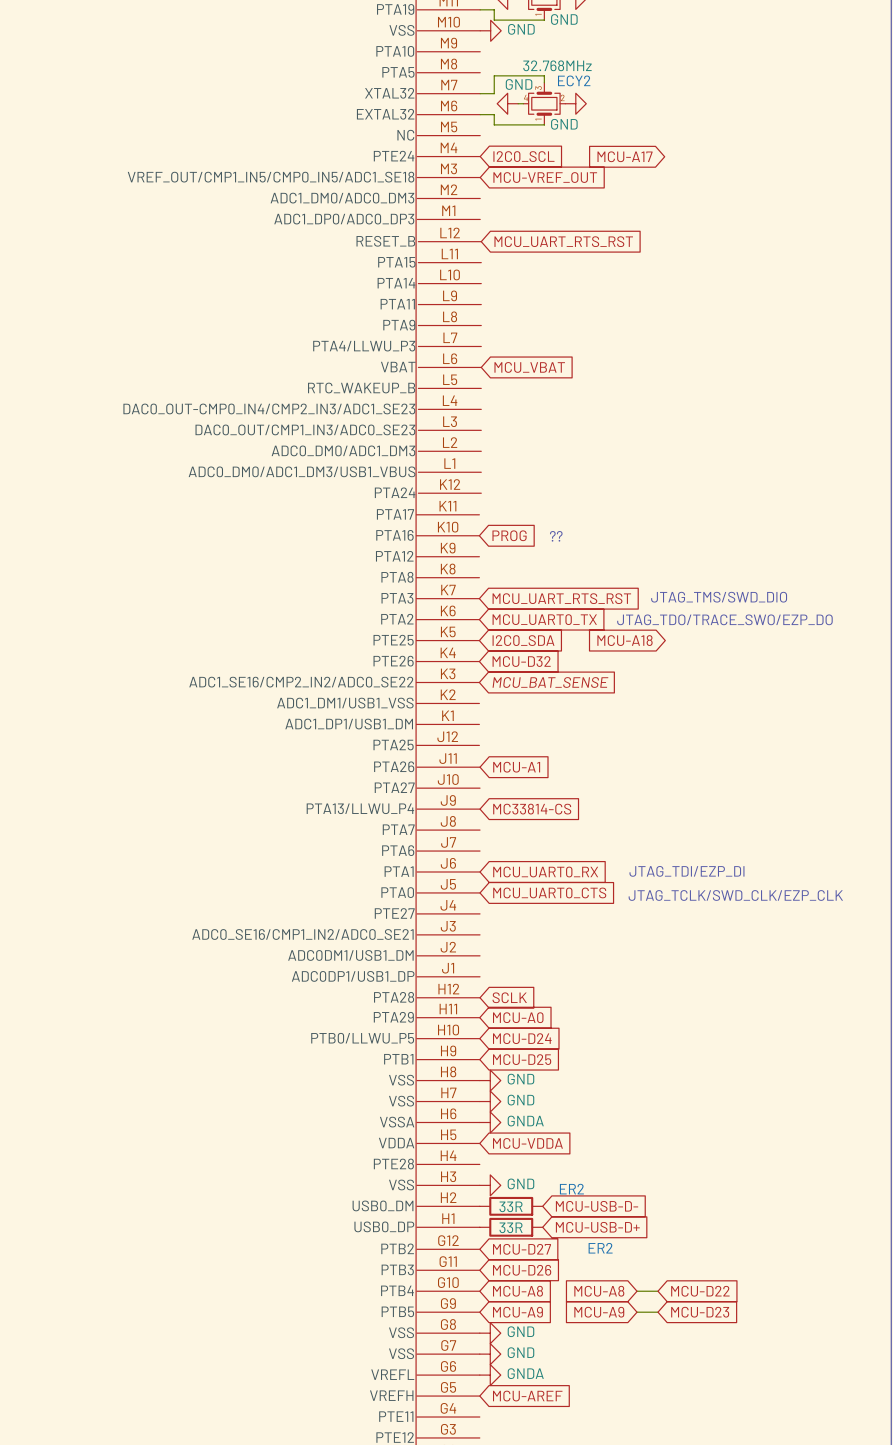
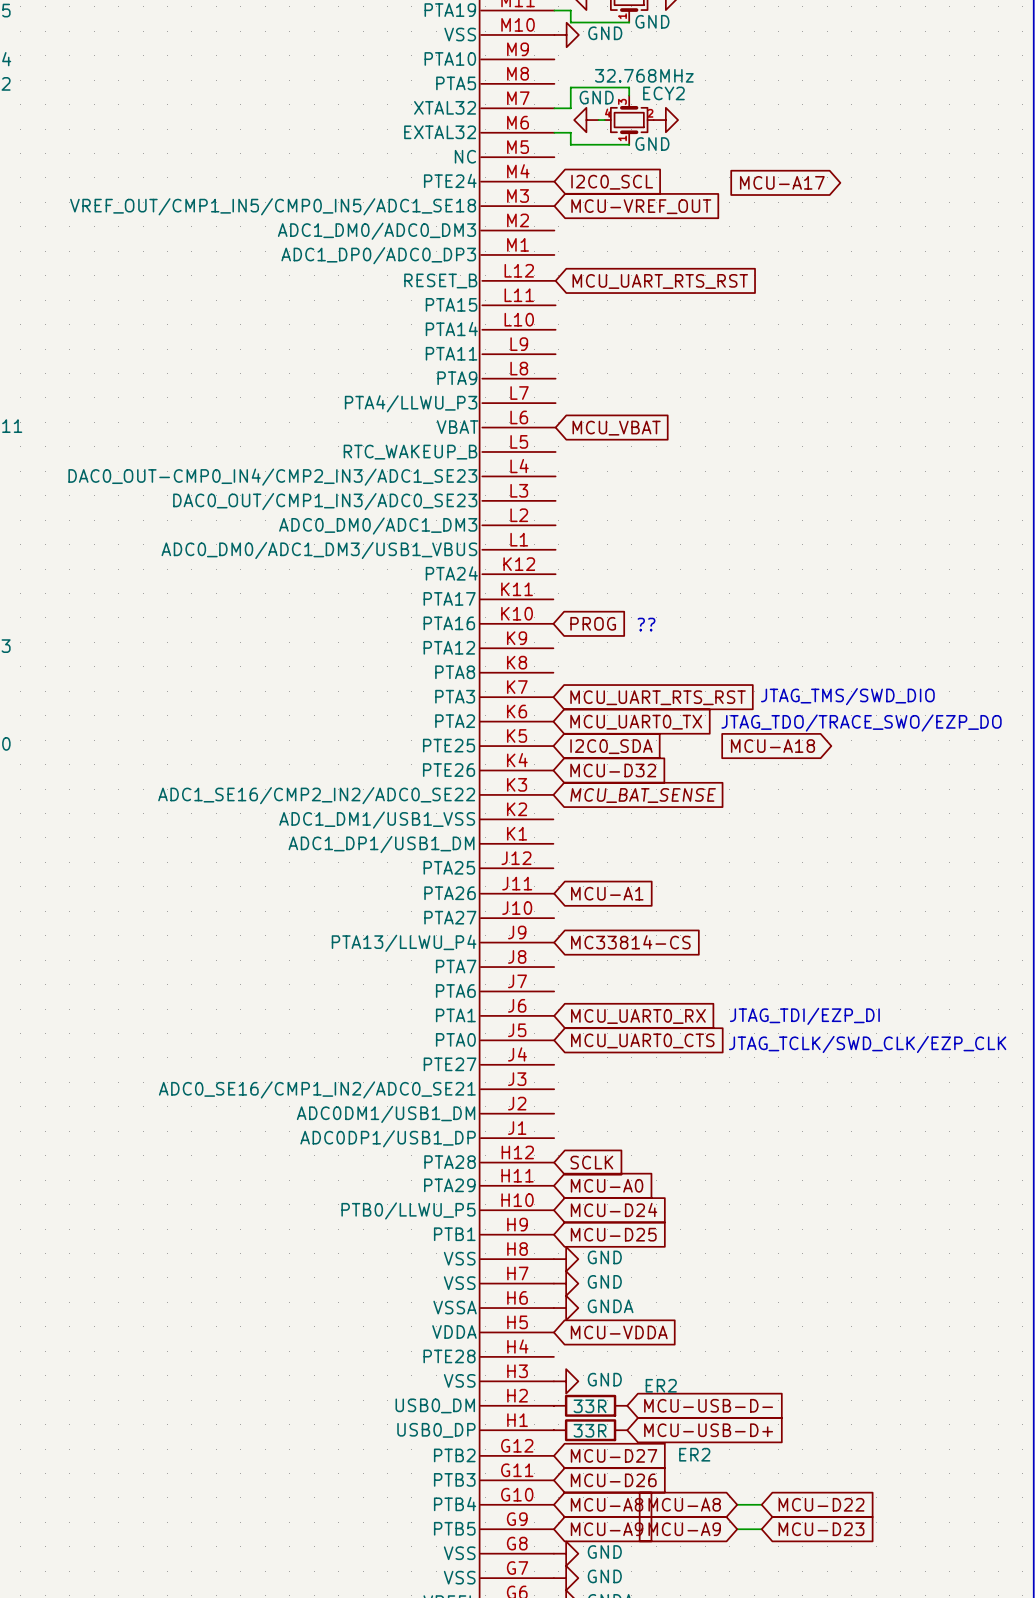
global label position: MCU-A17 (625, 156) -> MCU-A17 (782, 182)
global label position: MCU-A18 (625, 640) -> MCU-A18 (772, 746)

